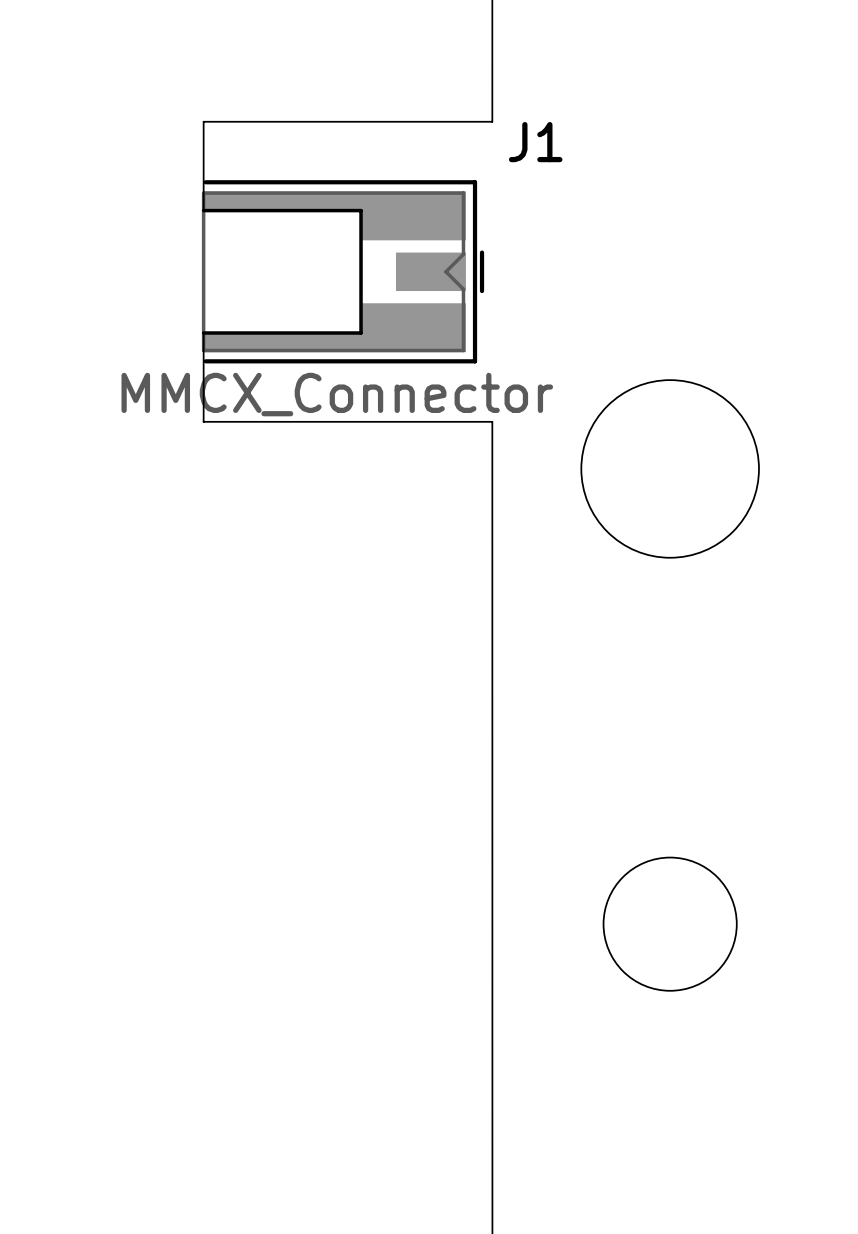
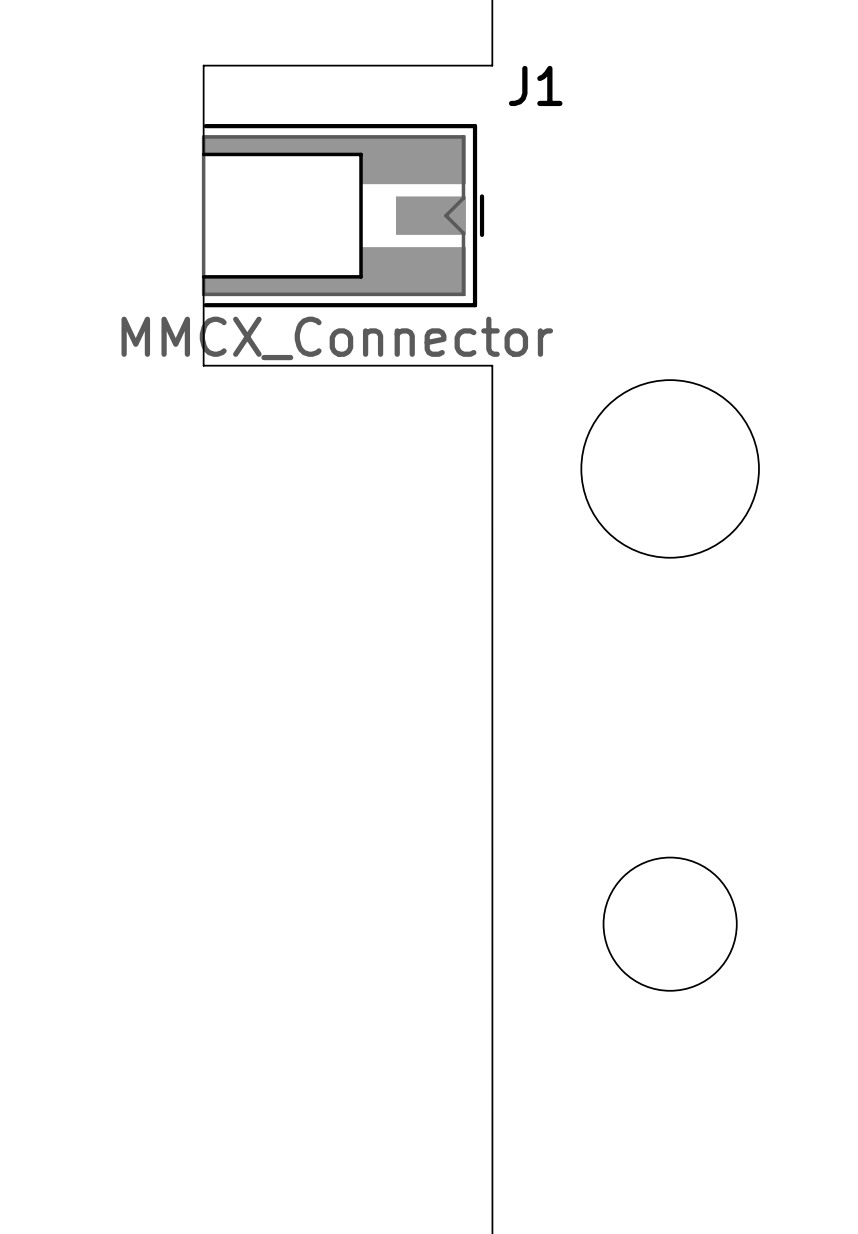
board edge: (492, 65) (492, 121) (203, 121) -> (492, 65) (203, 65) (203, 121)
board edge: (203, 154) (203, 210) -> (203, 276) (203, 332)
J1 position: (343, 271) -> (343, 215)
board edge: (203, 365) (203, 421) (492, 421) -> (203, 365) (492, 365) (492, 421)

